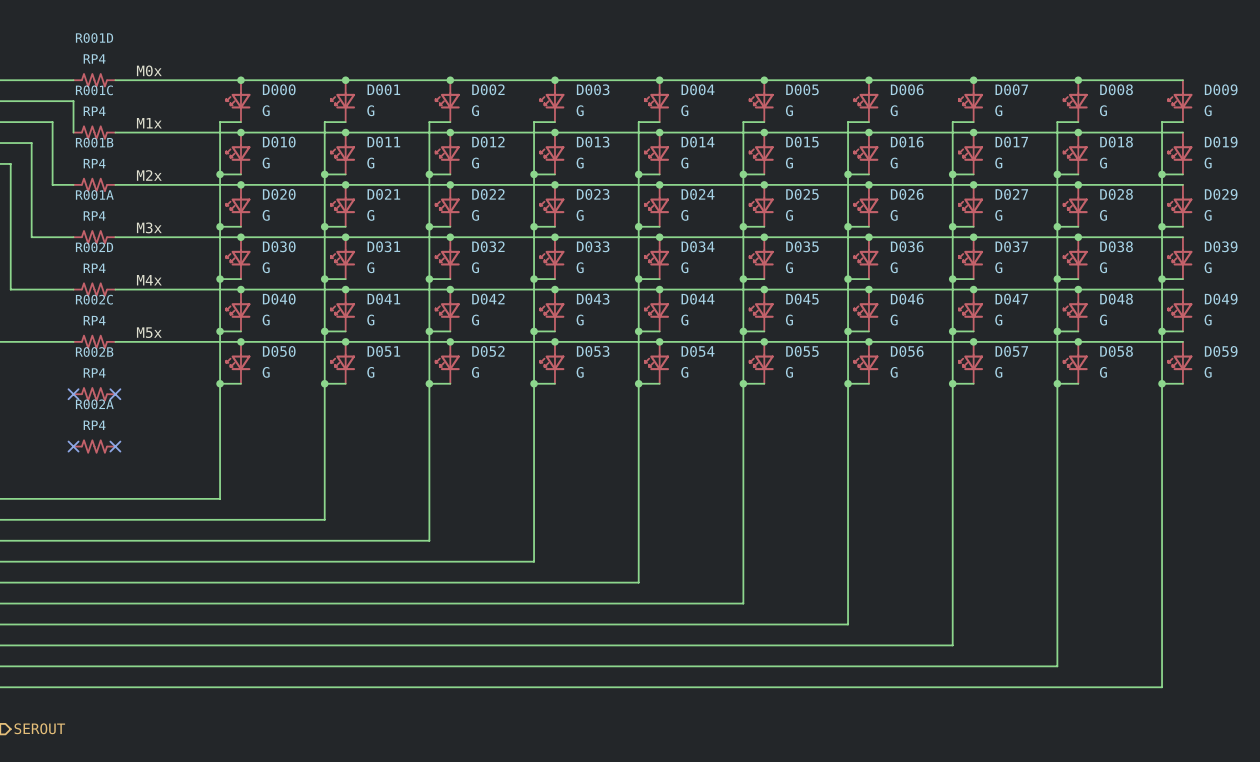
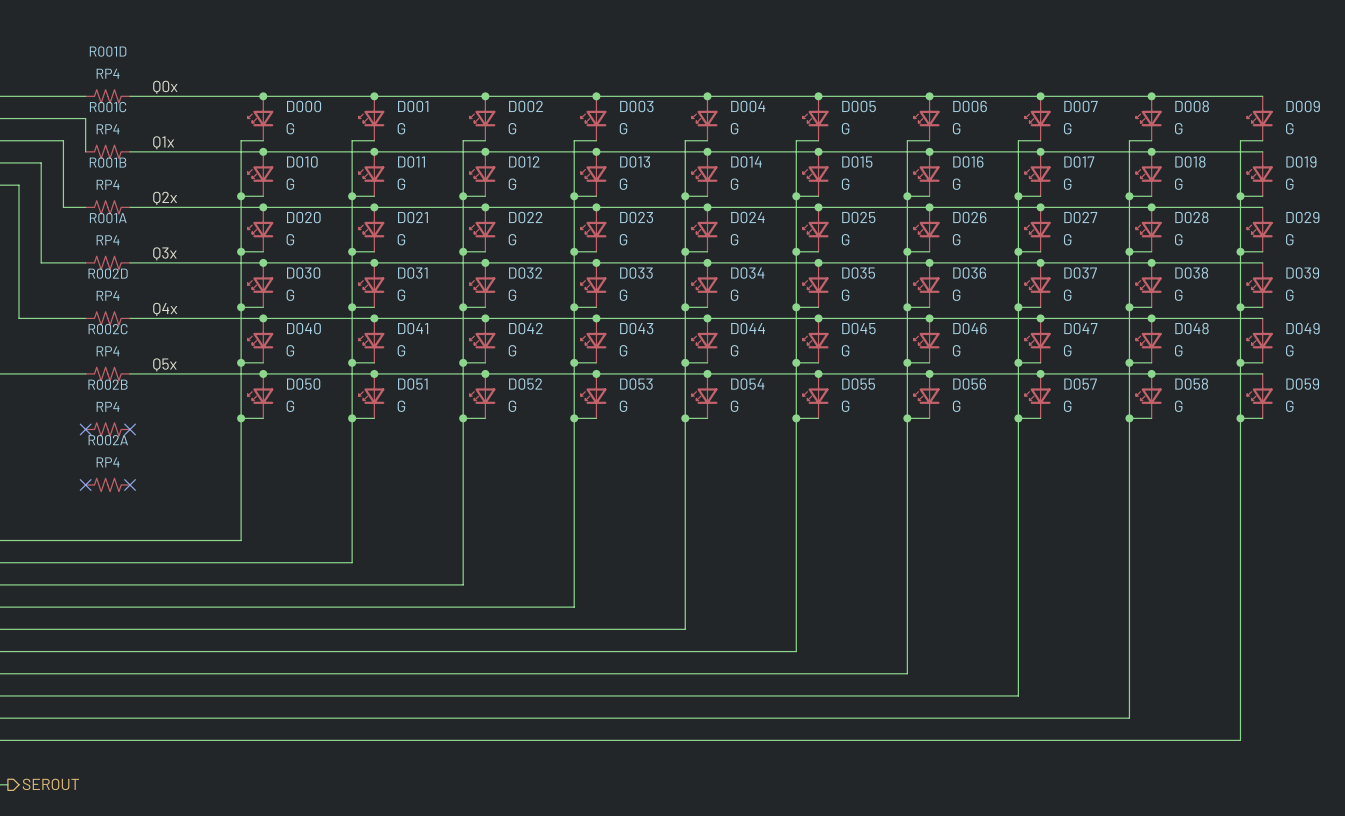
label: M0x (149, 70) -> Q0x (165, 87)
label: M1x (149, 123) -> Q1x (163, 142)
label: M2x (149, 175) -> Q2x (165, 198)
label: M3x (149, 227) -> Q3x (164, 253)
label: M4x (149, 280) -> Q4x (165, 309)
label: M5x (149, 332) -> Q5x (164, 364)

